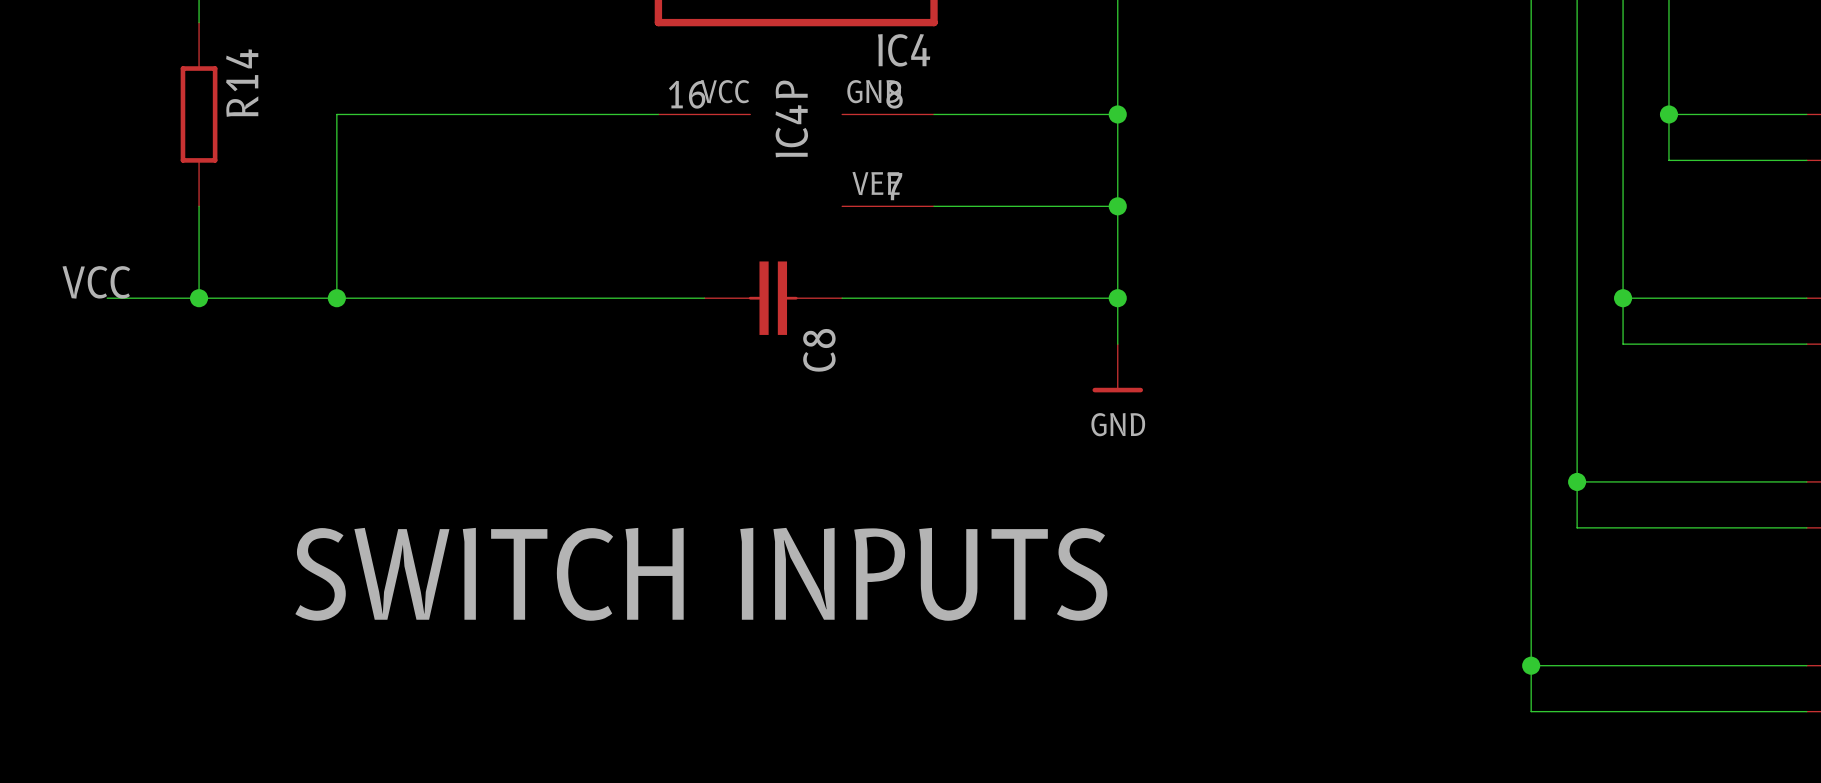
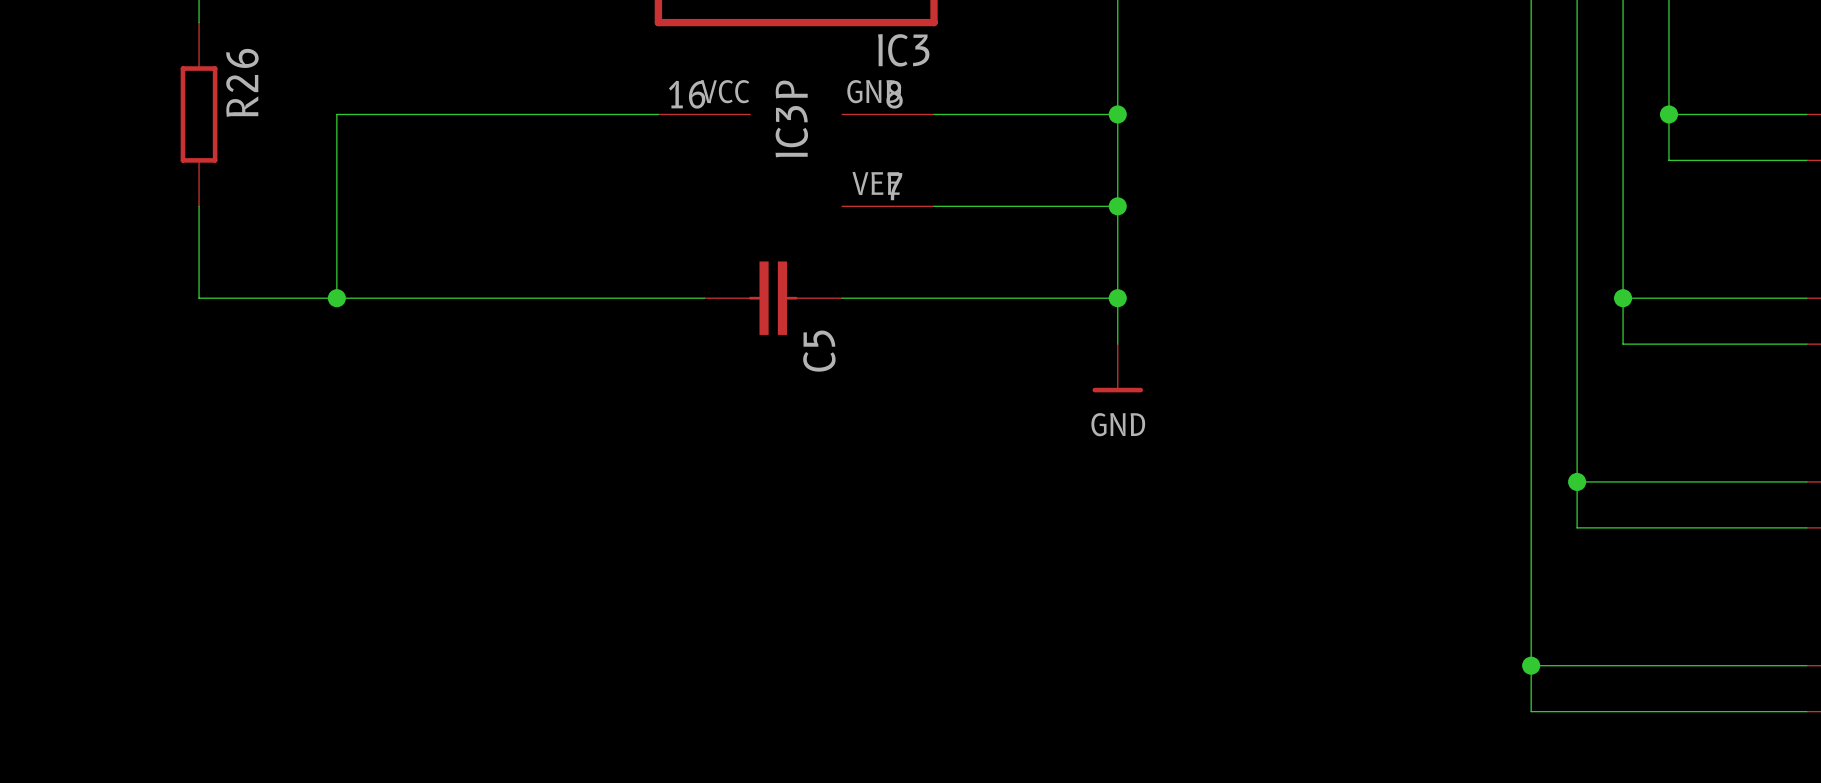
IC4 name: IC4 (904, 50) -> IC3 (903, 50)
R14 name: R14 (242, 83) -> R26 (242, 82)
IC4P name: IC4P (791, 118) -> IC3P (791, 118)
label: VCC (96, 282) -> none
wire: (107, 298) (199, 298) -> none
junction: (199, 298) -> none
C8 name: C8 (819, 350) -> C5 (819, 351)
text: SWITCH INPUTS (701, 574) -> none

